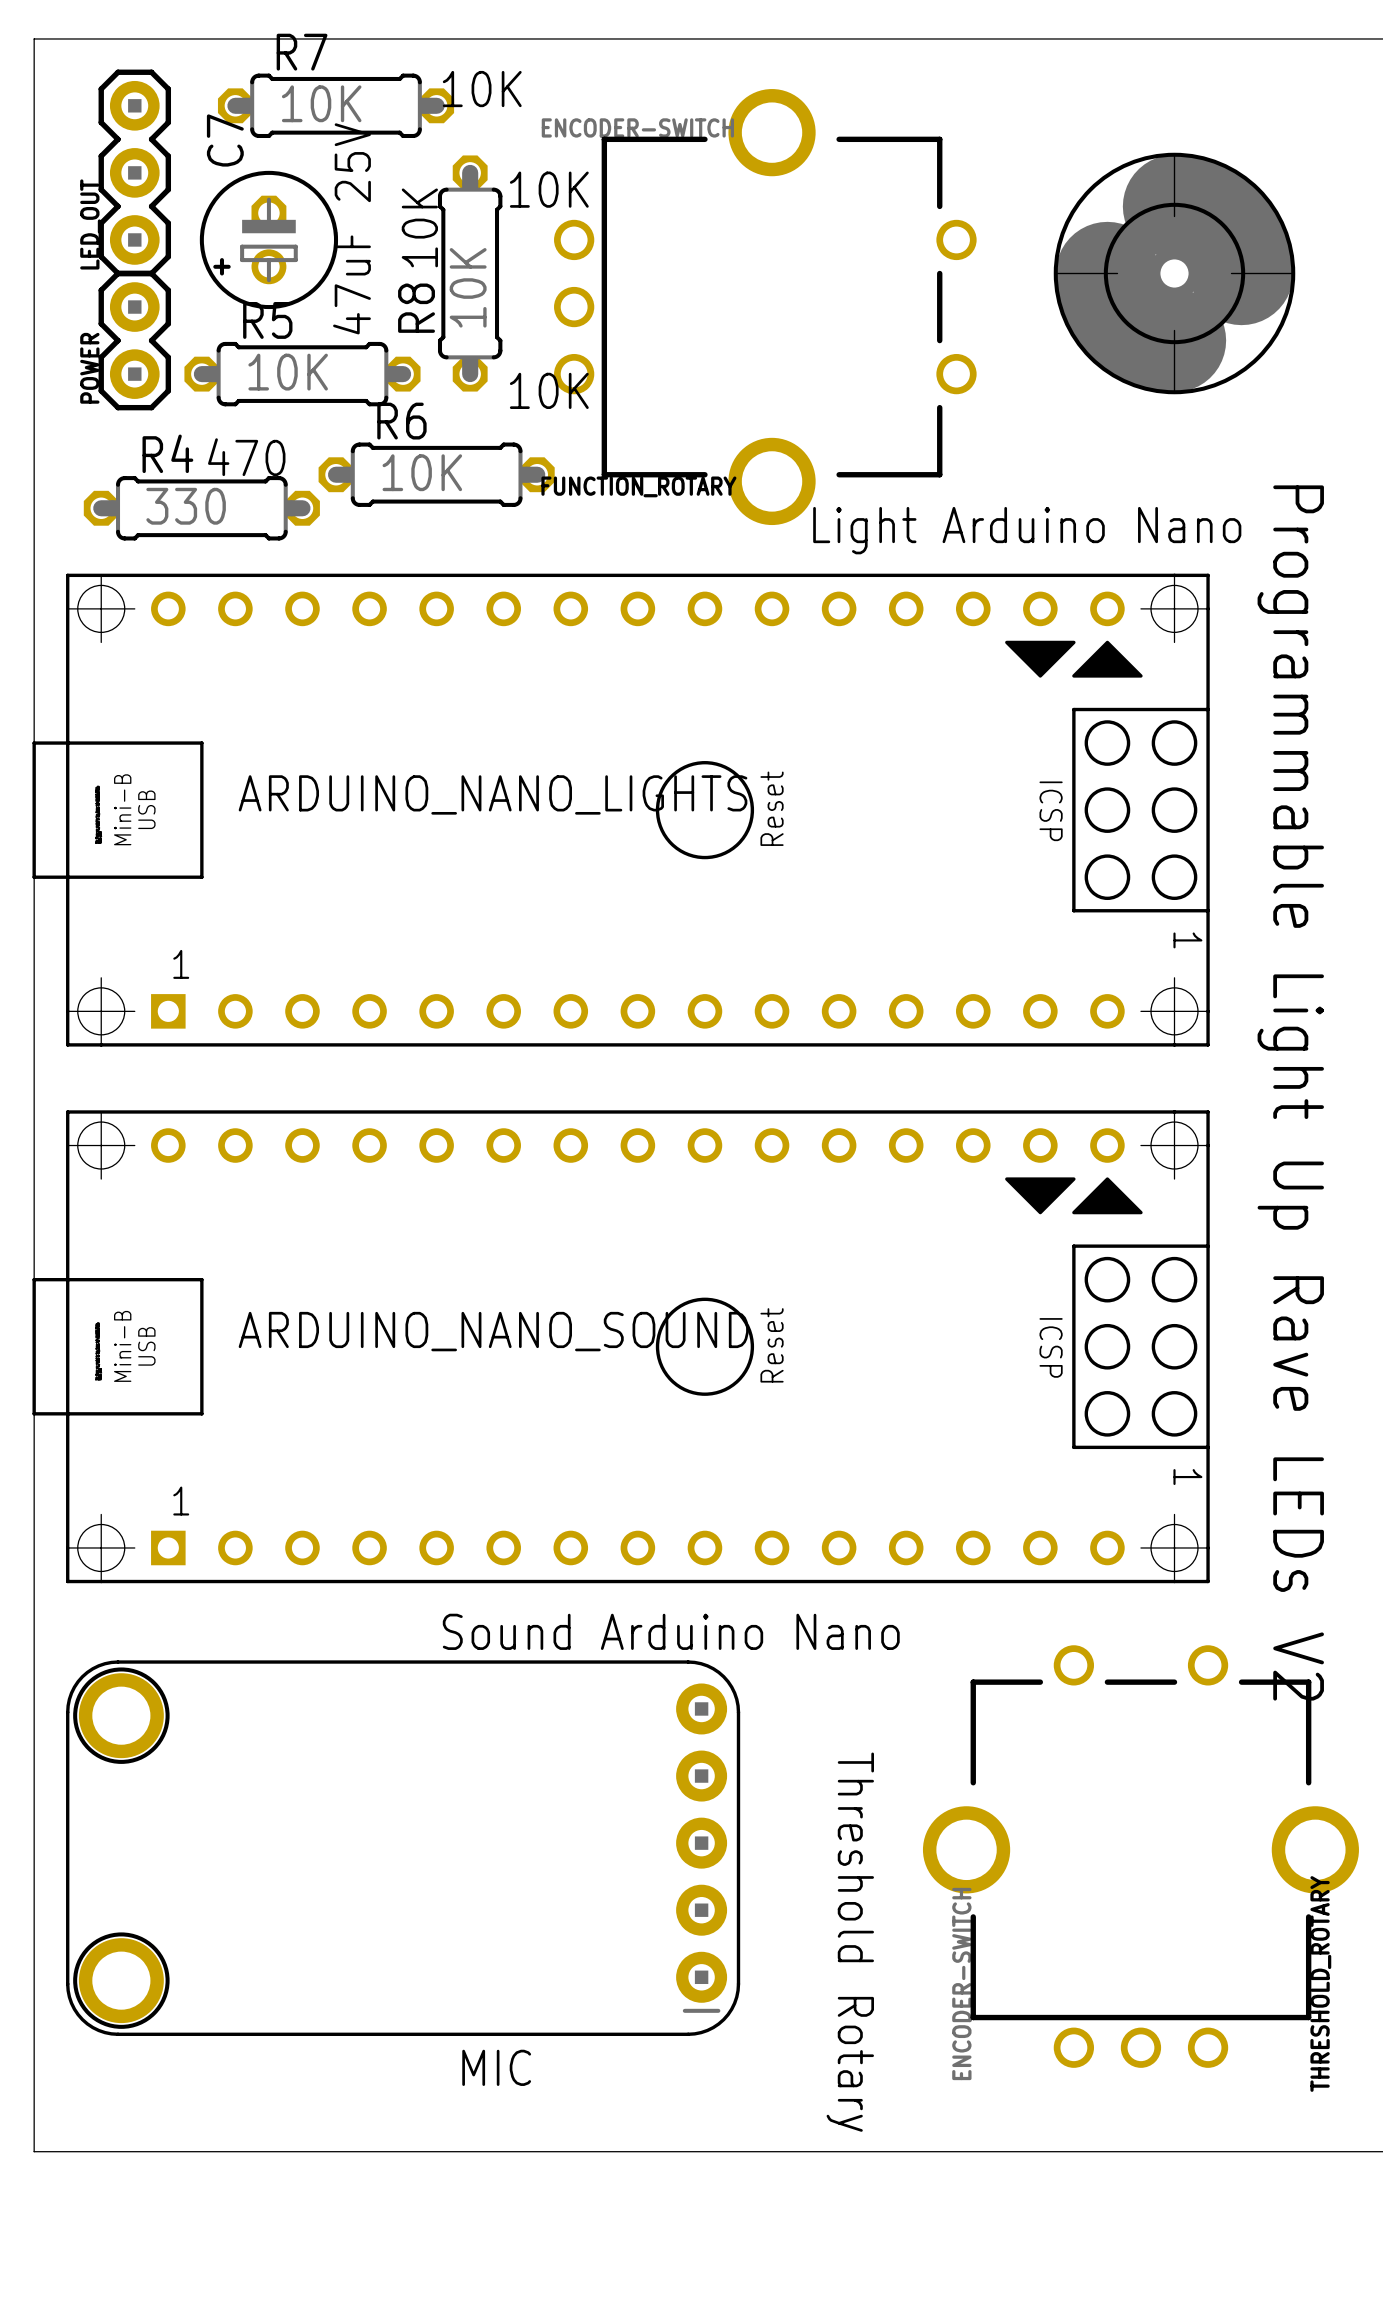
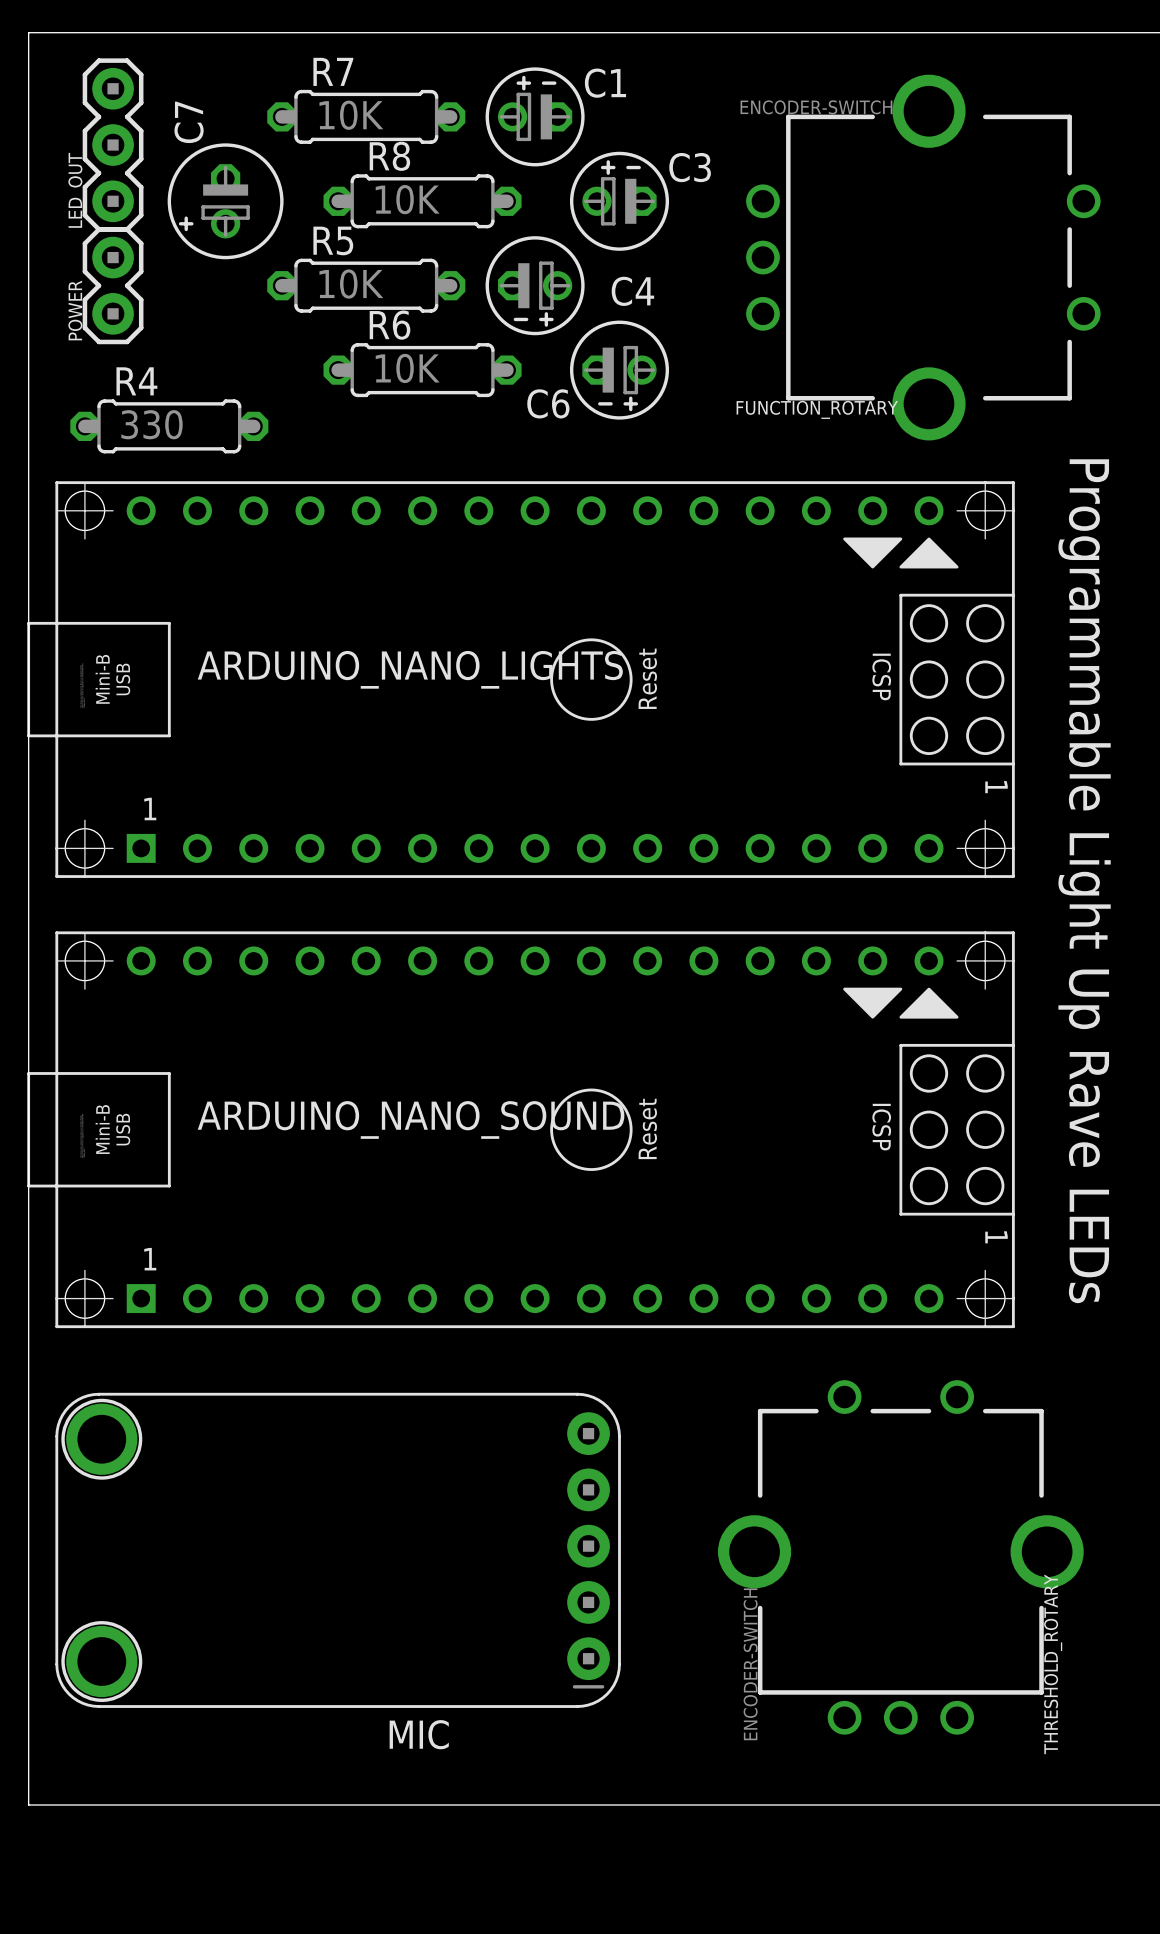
text: 10K (482, 89) -> none
R7 position: (336, 105) -> (366, 116)
C1: none -> (535, 116)
text: 10K (549, 189) -> none
text: 10K (419, 227) -> none
text: 47uF 25V (351, 228) -> none
C3: none -> (619, 201)
R8 rotation: 0° (470, 273) -> 90° clockwise (422, 201)
part: (1174, 273) -> none
FUNCTION_ROTARY position: (765, 307) -> (923, 257)
C4: none -> (535, 285)
R5 position: (302, 374) -> (366, 285)
text: 10K (549, 390) -> none
C6: none -> (619, 370)
text: 470 (246, 457) -> none
R6 position: (436, 474) -> (422, 370)
text: Light Arduino Nano (1027, 530) -> none
text: Programmable Light Up Rave LEDs V2 (1290, 1092) -> Programmable Light Up Rave LEDs (1084, 881)
text: Sound Arduino Nano (671, 1631) -> none
THRESHOLD_ROTARY position: (1140, 1856) -> (900, 1557)
text: Threshold Rotary (850, 1942) -> none

